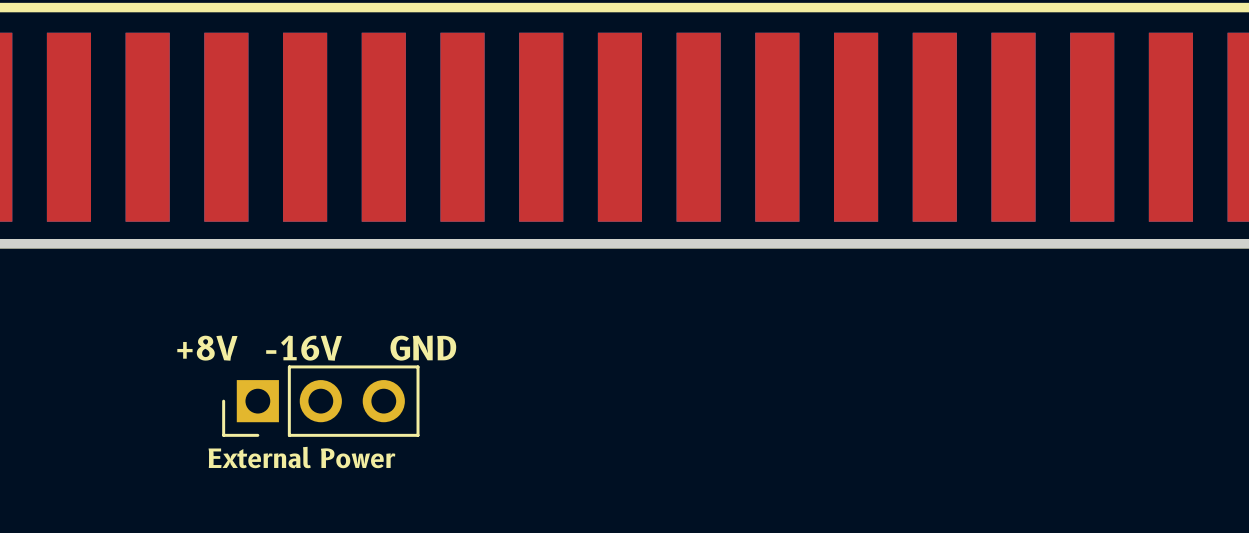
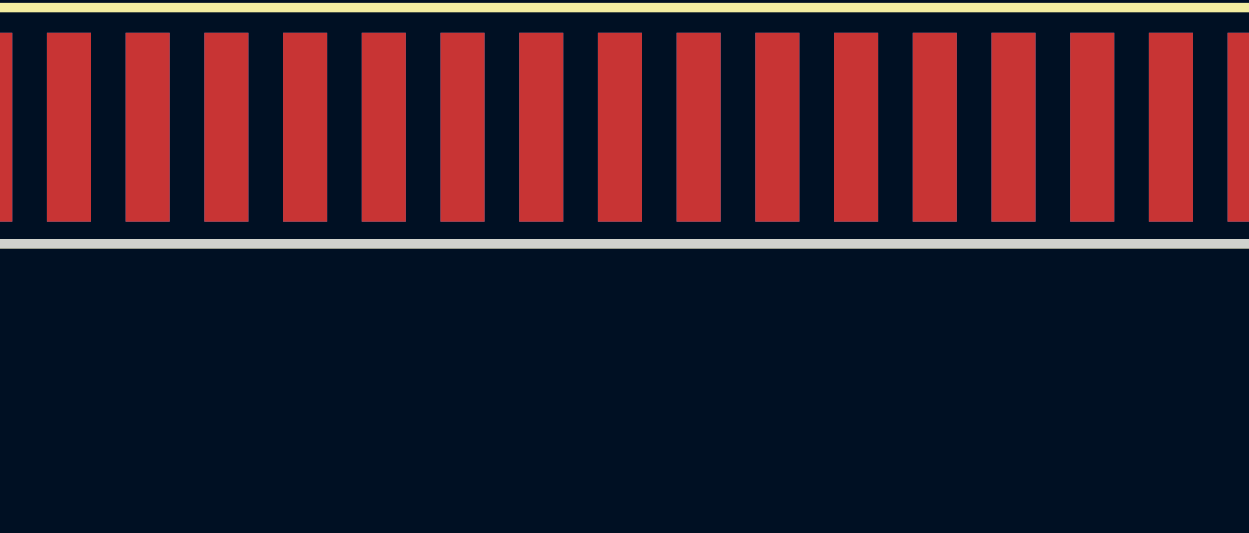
text: +8V (207, 348) -> none
text: -16V (304, 348) -> none
text: GND (423, 348) -> none
part: (320, 401) -> none
text: External Power (301, 457) -> none

